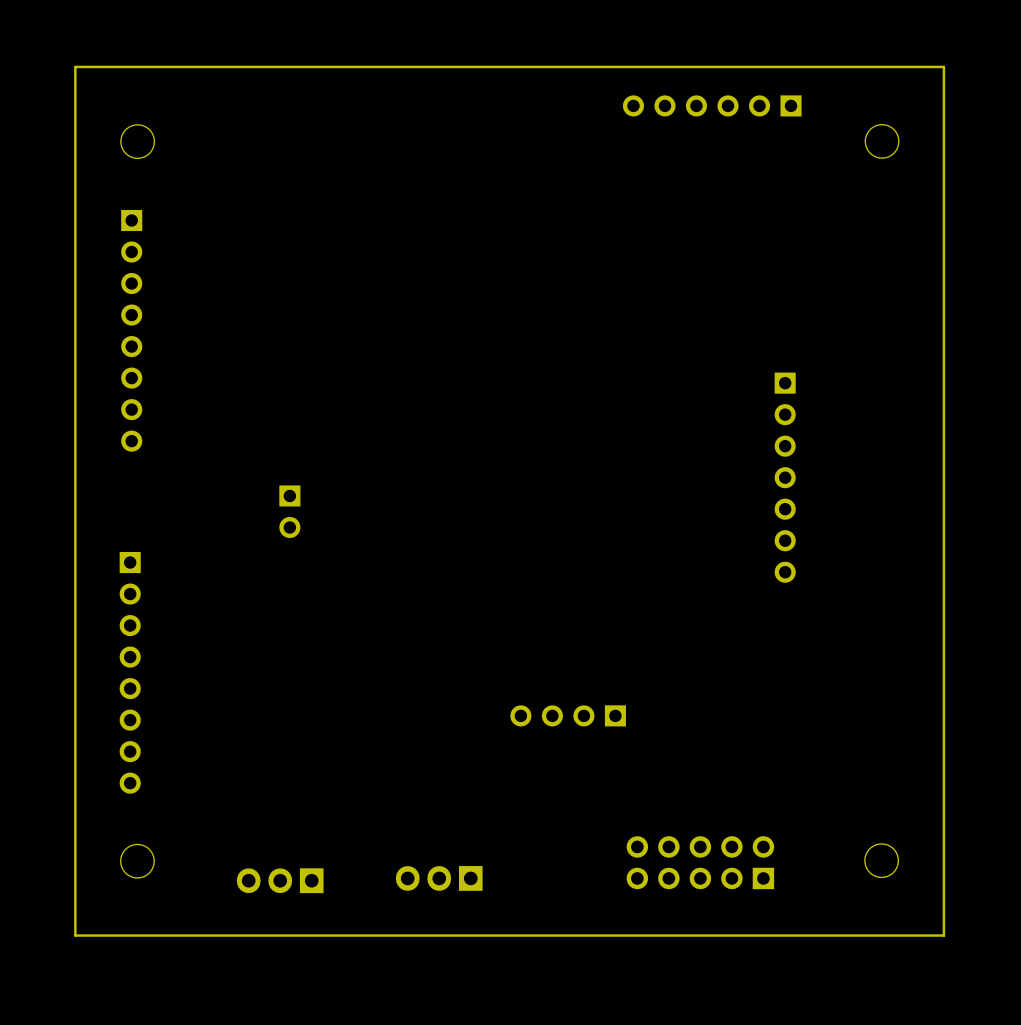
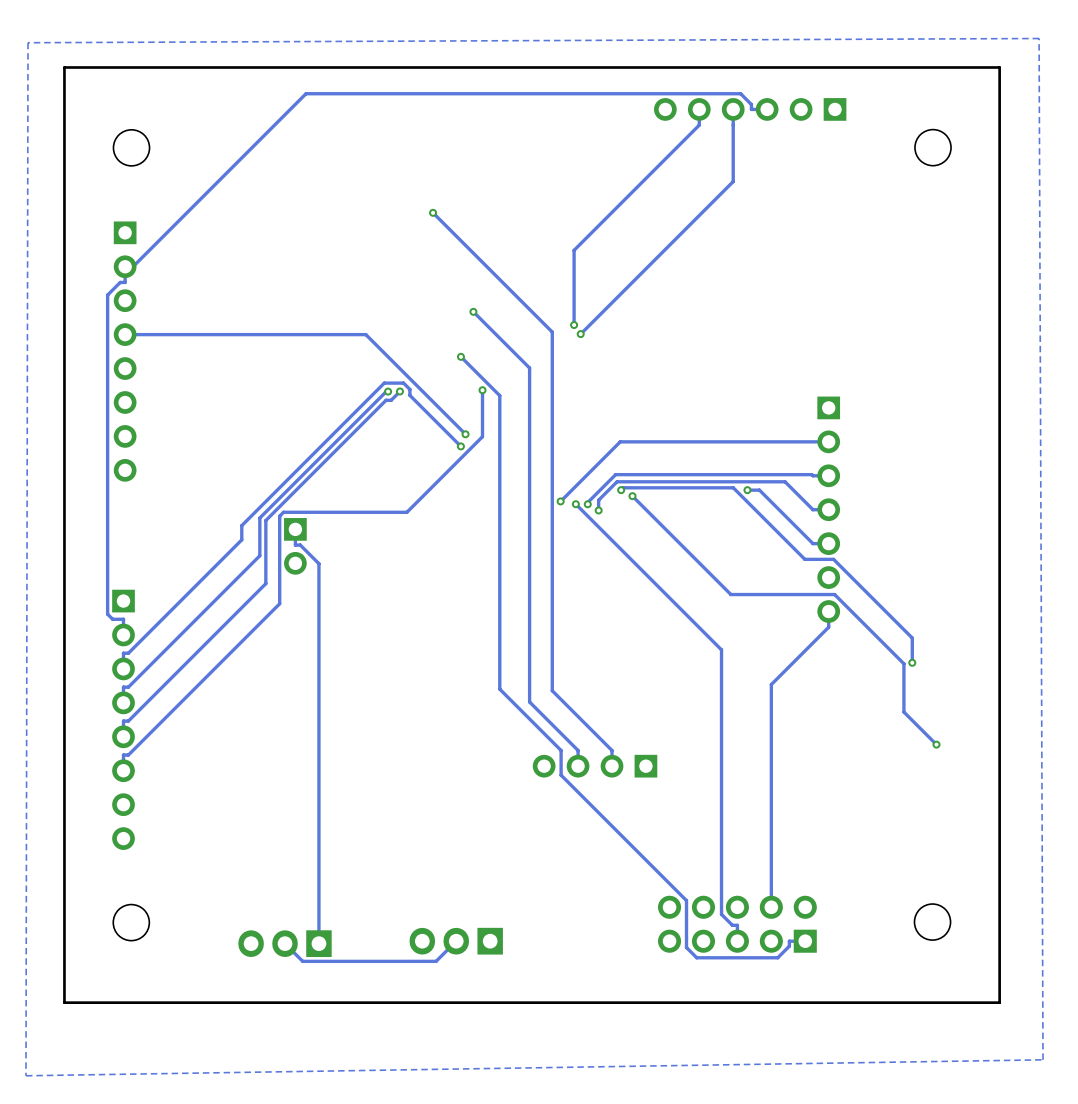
zone outline: none -> (1039, 38) (28, 42) (25, 1075) (1043, 1059) (1039, 38)
track: none -> (699, 109) (699, 125) (574, 250) (574, 325)
track: none -> (733, 109) (733, 181) (580, 334)
track: none -> (767, 109) (751, 109) (751, 104) (740, 93) (306, 93) (125, 274)
track: none -> (433, 212) (552, 332) (552, 690) (612, 750) (612, 766)
via: none -> (433, 212)
track: none -> (125, 266) (125, 282) (120, 282) (107, 295) (107, 614) (112, 619) (123, 619) (123, 634)
track: none -> (473, 311) (529, 368) (529, 702) (578, 750) (578, 766)
via: none -> (473, 311)
via: none -> (574, 325)
via: none -> (580, 334)
track: none -> (125, 334) (365, 334) (465, 434)
track: none -> (460, 356) (499, 395) (499, 689) (561, 750) (561, 775) (686, 900) (686, 947) (696, 957) (777, 957) (789, 946) (789, 941) (805, 941)
via: none -> (460, 356)
track: none -> (482, 390) (482, 436) (406, 512) (283, 512) (279, 516) (279, 603) (128, 755) (123, 755) (123, 770)
via: none -> (482, 390)
track: none -> (388, 391) (259, 518) (259, 555) (128, 687) (123, 687) (123, 702)
via: none -> (388, 391)
track: none -> (399, 391) (391, 400) (386, 400) (265, 520) (265, 583) (128, 721) (123, 721) (123, 736)
via: none -> (399, 391)
via: none -> (465, 434)
track: none -> (828, 441) (620, 441) (560, 501)
track: none -> (460, 446) (409, 395) (409, 389) (403, 383) (384, 383) (241, 525) (241, 539) (128, 653) (123, 653) (123, 668)
via: none -> (460, 446)
track: none -> (828, 475) (615, 474) (587, 504)
track: none -> (621, 490) (623, 487) (733, 487) (804, 559) (833, 559) (912, 638) (912, 662)
via: none -> (621, 490)
track: none -> (747, 490) (759, 490) (812, 543) (828, 543)
via: none -> (747, 490)
track: none -> (632, 496) (730, 594) (834, 594) (903, 663) (903, 712) (936, 744)
via: none -> (632, 496)
via: none -> (560, 501)
track: none -> (575, 504) (721, 649) (721, 914) (732, 925) (737, 925) (737, 941)
via: none -> (575, 504)
via: none -> (587, 504)
track: none -> (828, 509) (812, 509) (785, 481) (617, 481) (598, 500) (598, 510)
via: none -> (598, 510)
track: none -> (295, 529) (295, 545) (300, 545) (318, 563) (318, 943)
track: none -> (828, 611) (828, 627) (771, 684) (771, 907)
via: none -> (912, 662)
via: none -> (936, 744)
track: none -> (456, 941) (436, 961) (302, 961) (285, 943)

